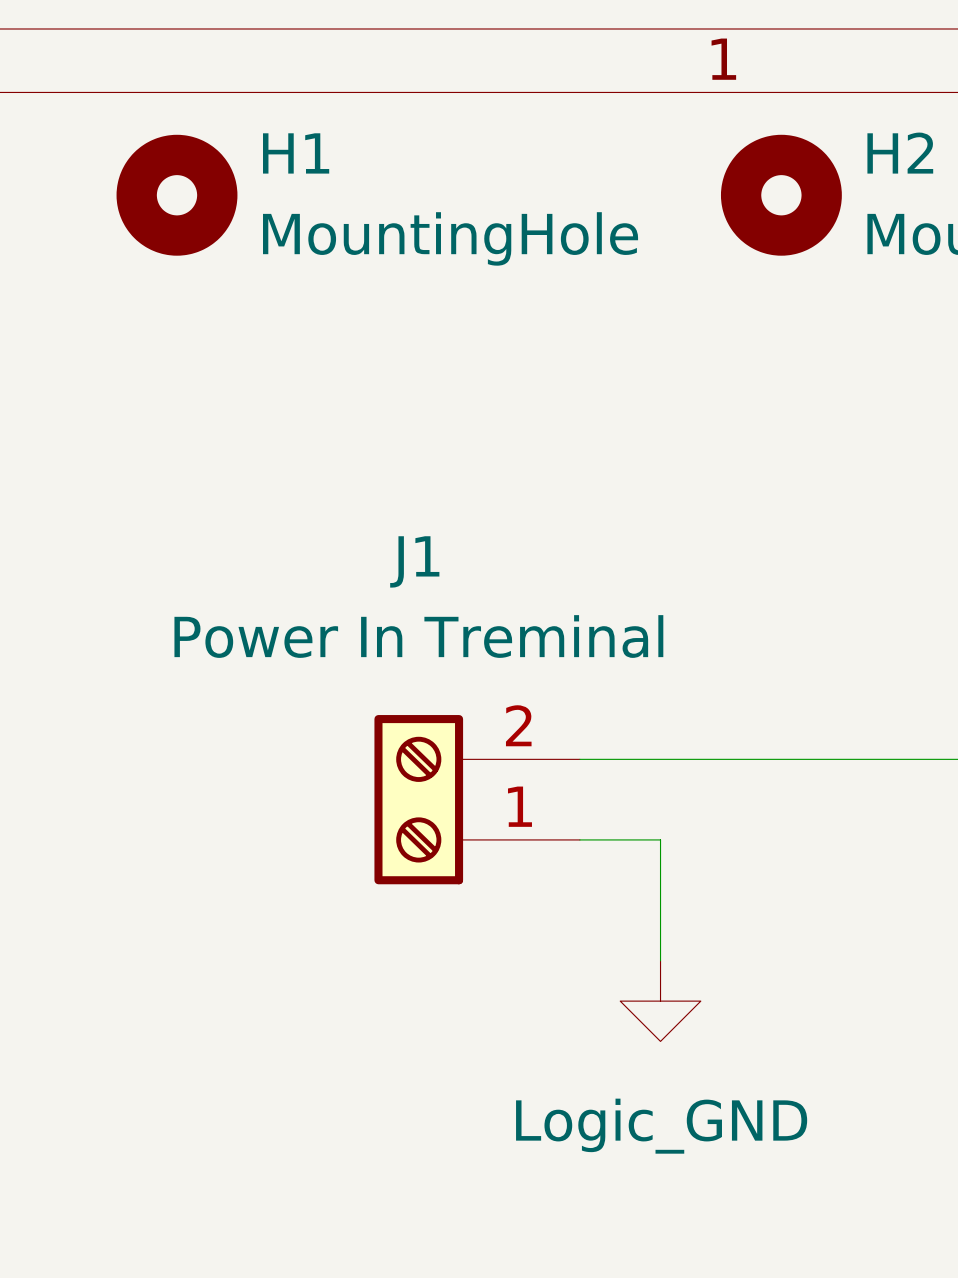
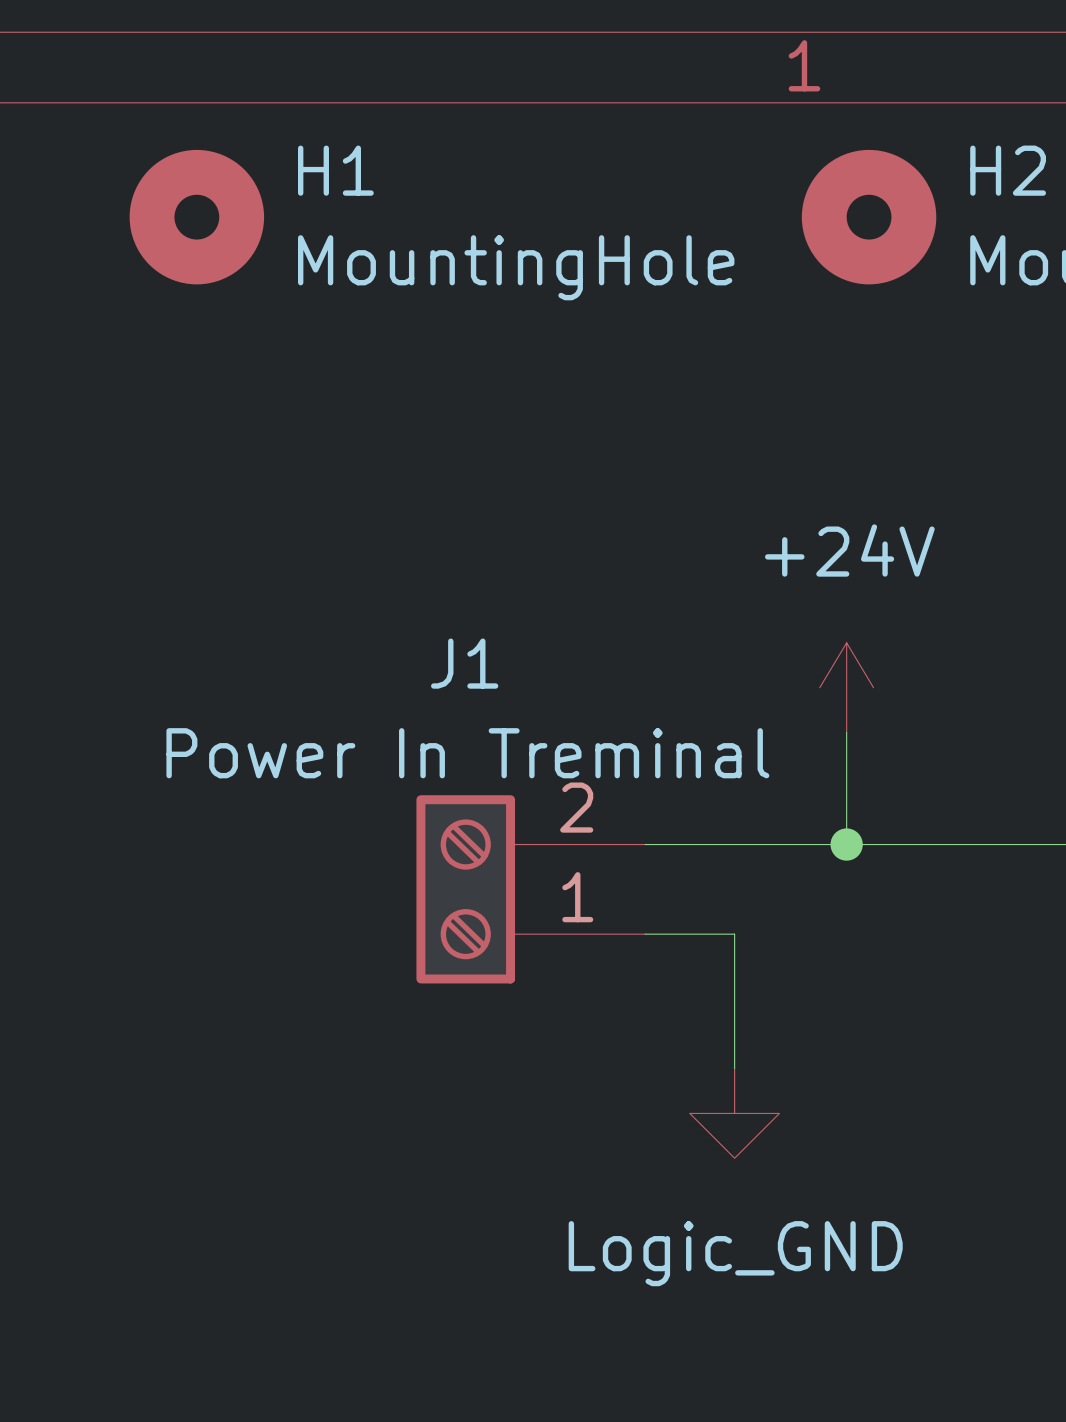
J1 name position: J1 (414, 561) -> J1 (464, 663)
power symbol: none -> +24V (846, 687)
J1 value position: Power In Treminal (418, 636) -> Power In Treminal (467, 753)
wire: none -> (846, 732) (846, 844)
junction: none -> (846, 844)

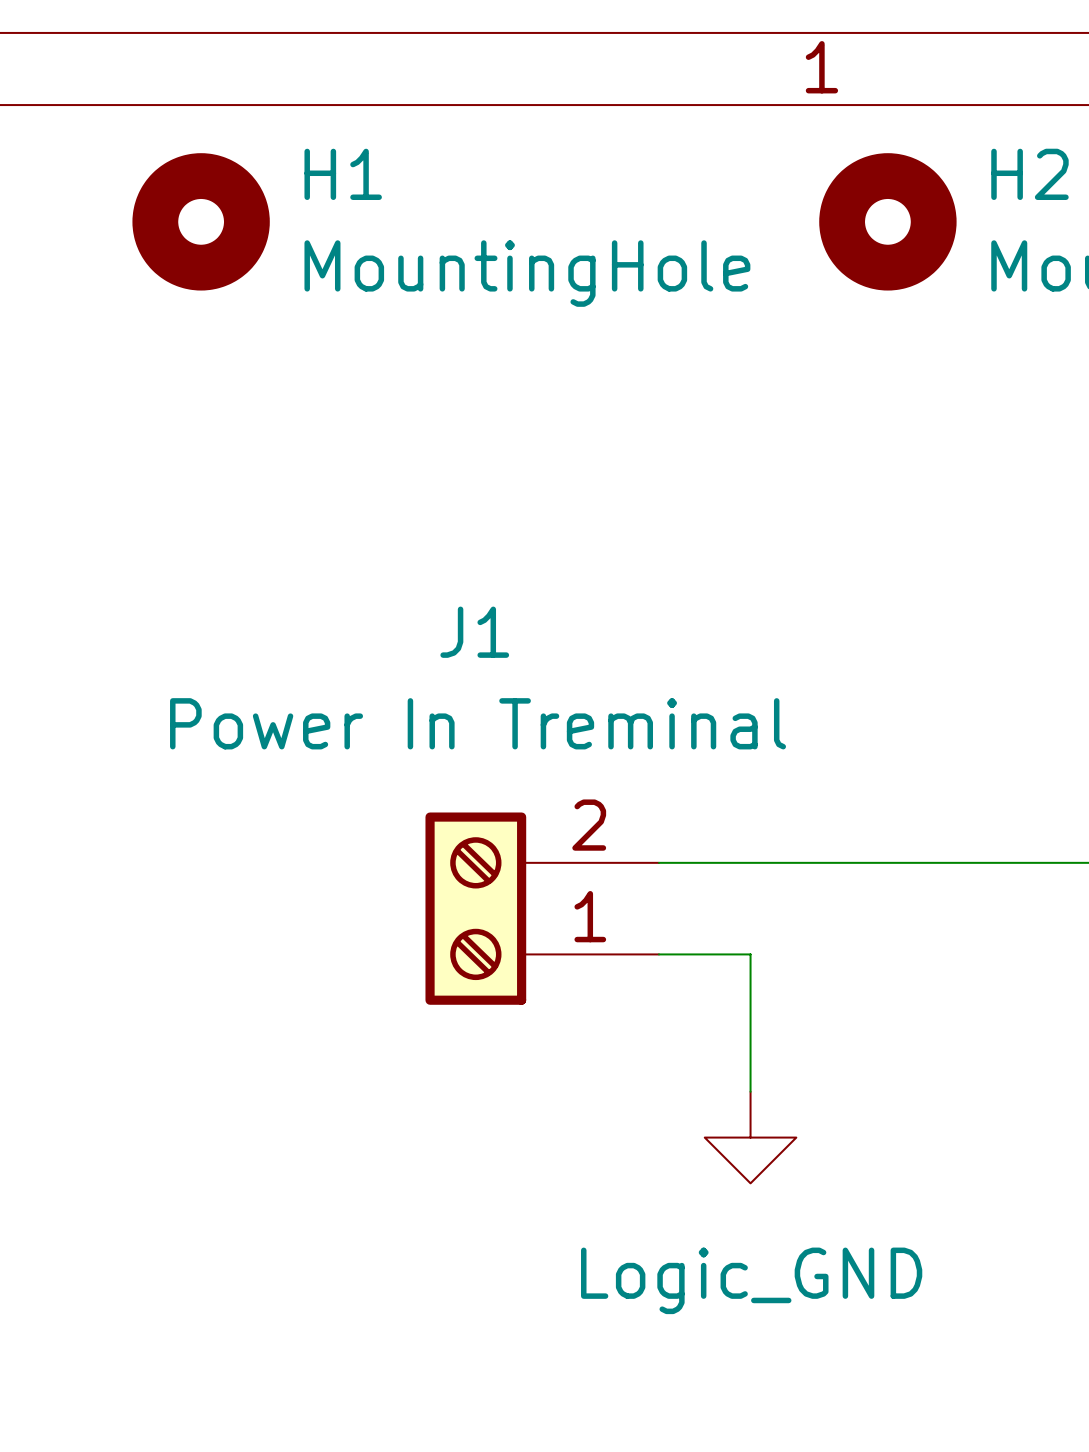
J1 name position: J1 (464, 663) -> J1 (474, 632)
power symbol: +24V (846, 687) -> none
wire: (846, 732) (846, 844) -> none
J1 value position: Power In Treminal (467, 753) -> Power In Treminal (478, 723)
junction: (846, 844) -> none

